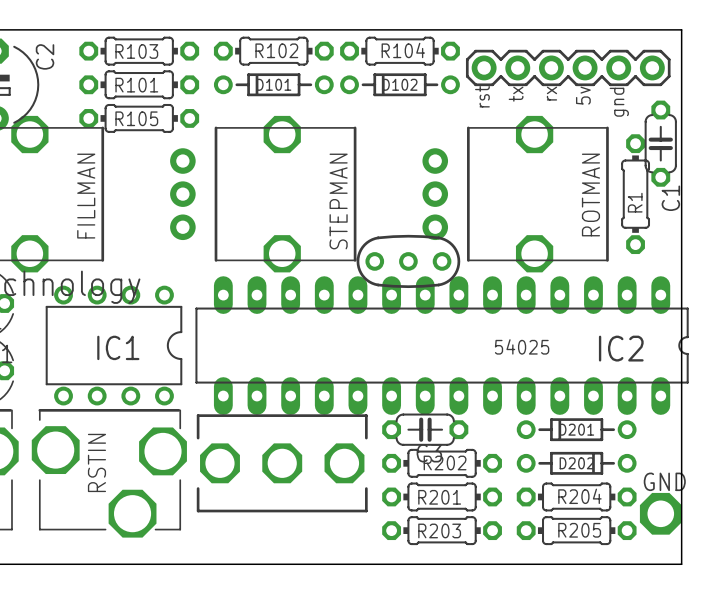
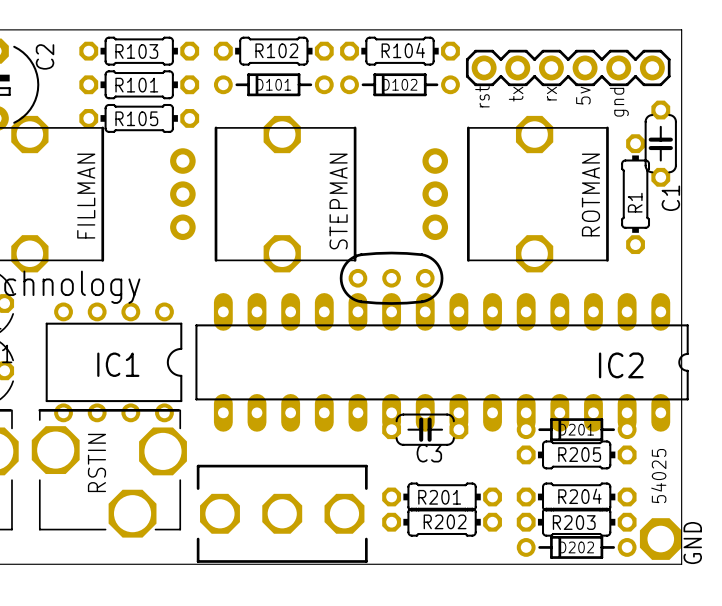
part position: (408, 261) -> (391, 278)
IC1 position: (113, 345) -> (113, 362)
IC2 position: (442, 345) -> (442, 362)
text rotation: 0° (522, 346) -> 90° counterclockwise (658, 476)
text position: 54025 (522, 346) -> 54025 (658, 476)
part position: (282, 463) -> (282, 513)
R202 position: (442, 463) -> (442, 522)
D202 rotation: 0° (576, 463) -> 180° (576, 547)
D202 position: (576, 463) -> (576, 547)
GND name rotation: 0° (664, 481) -> 90° counterclockwise (692, 543)
GND position: (660, 513) -> (660, 539)
R203 position: (442, 530) -> (576, 522)
R205 position: (576, 530) -> (576, 454)

